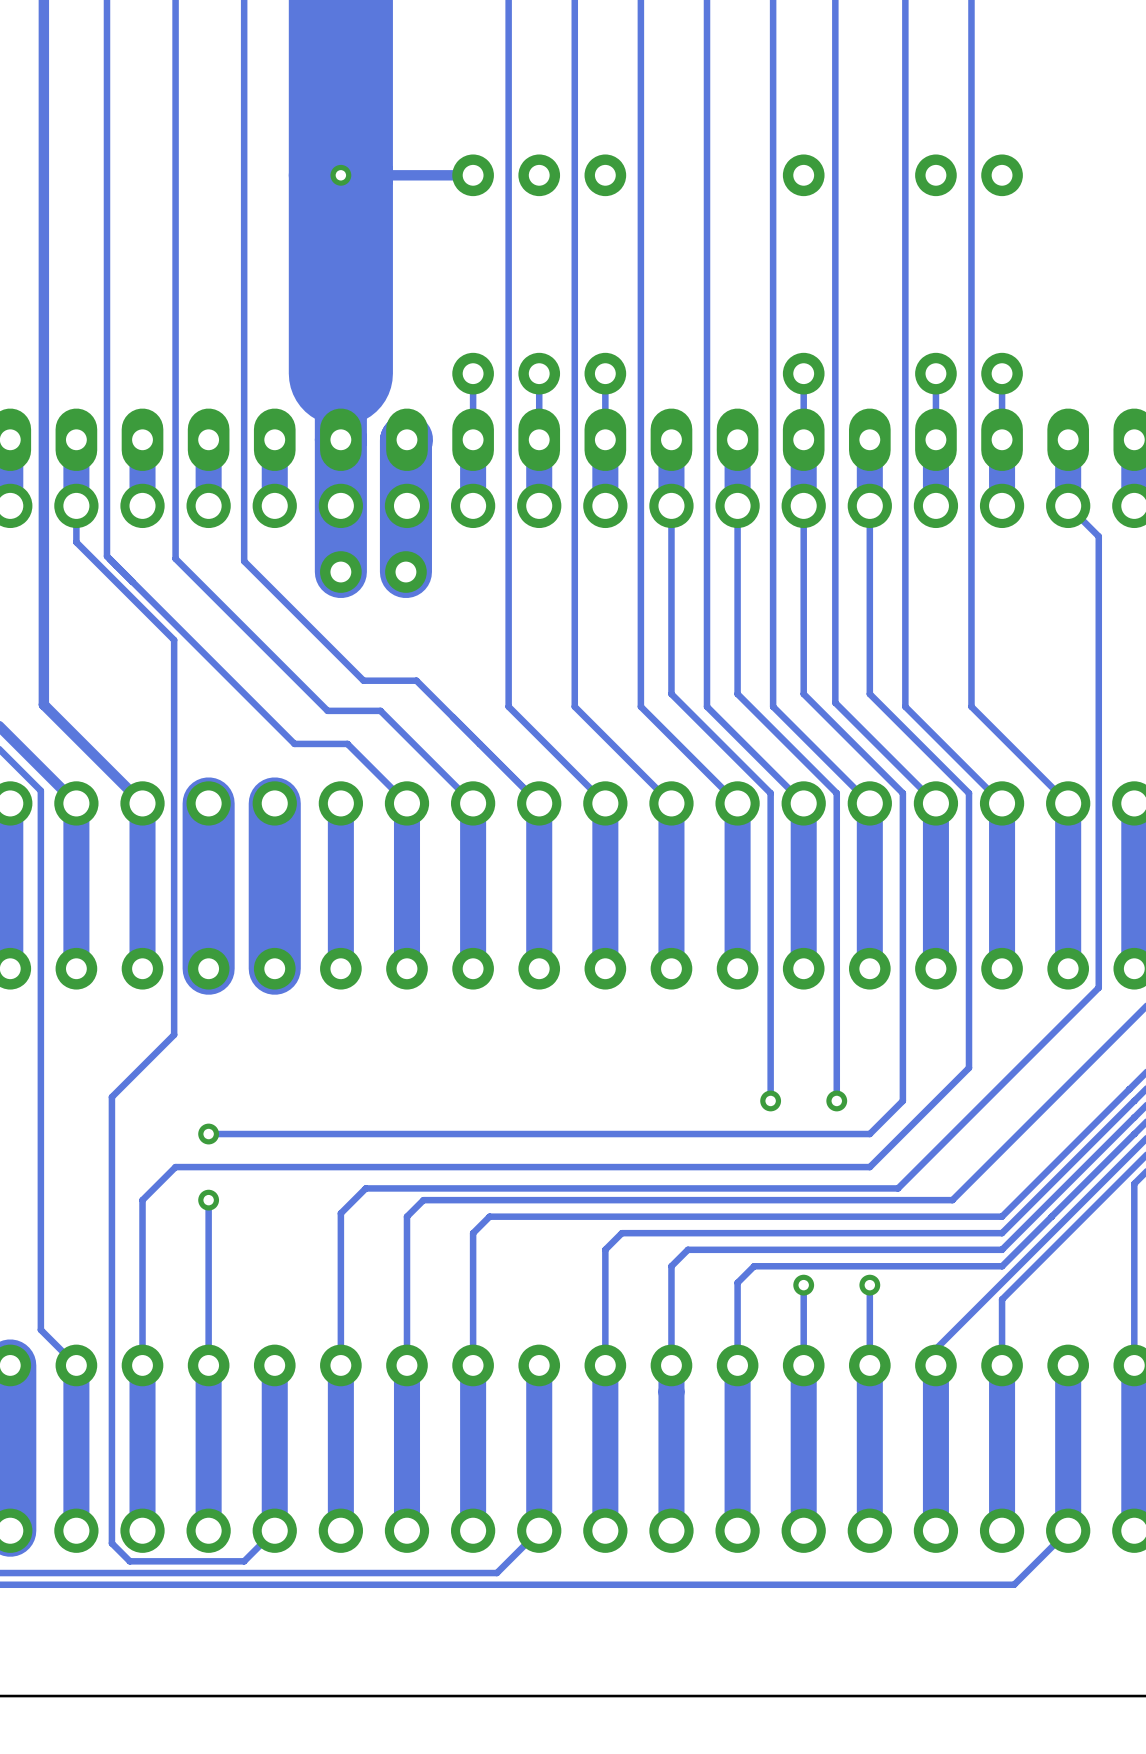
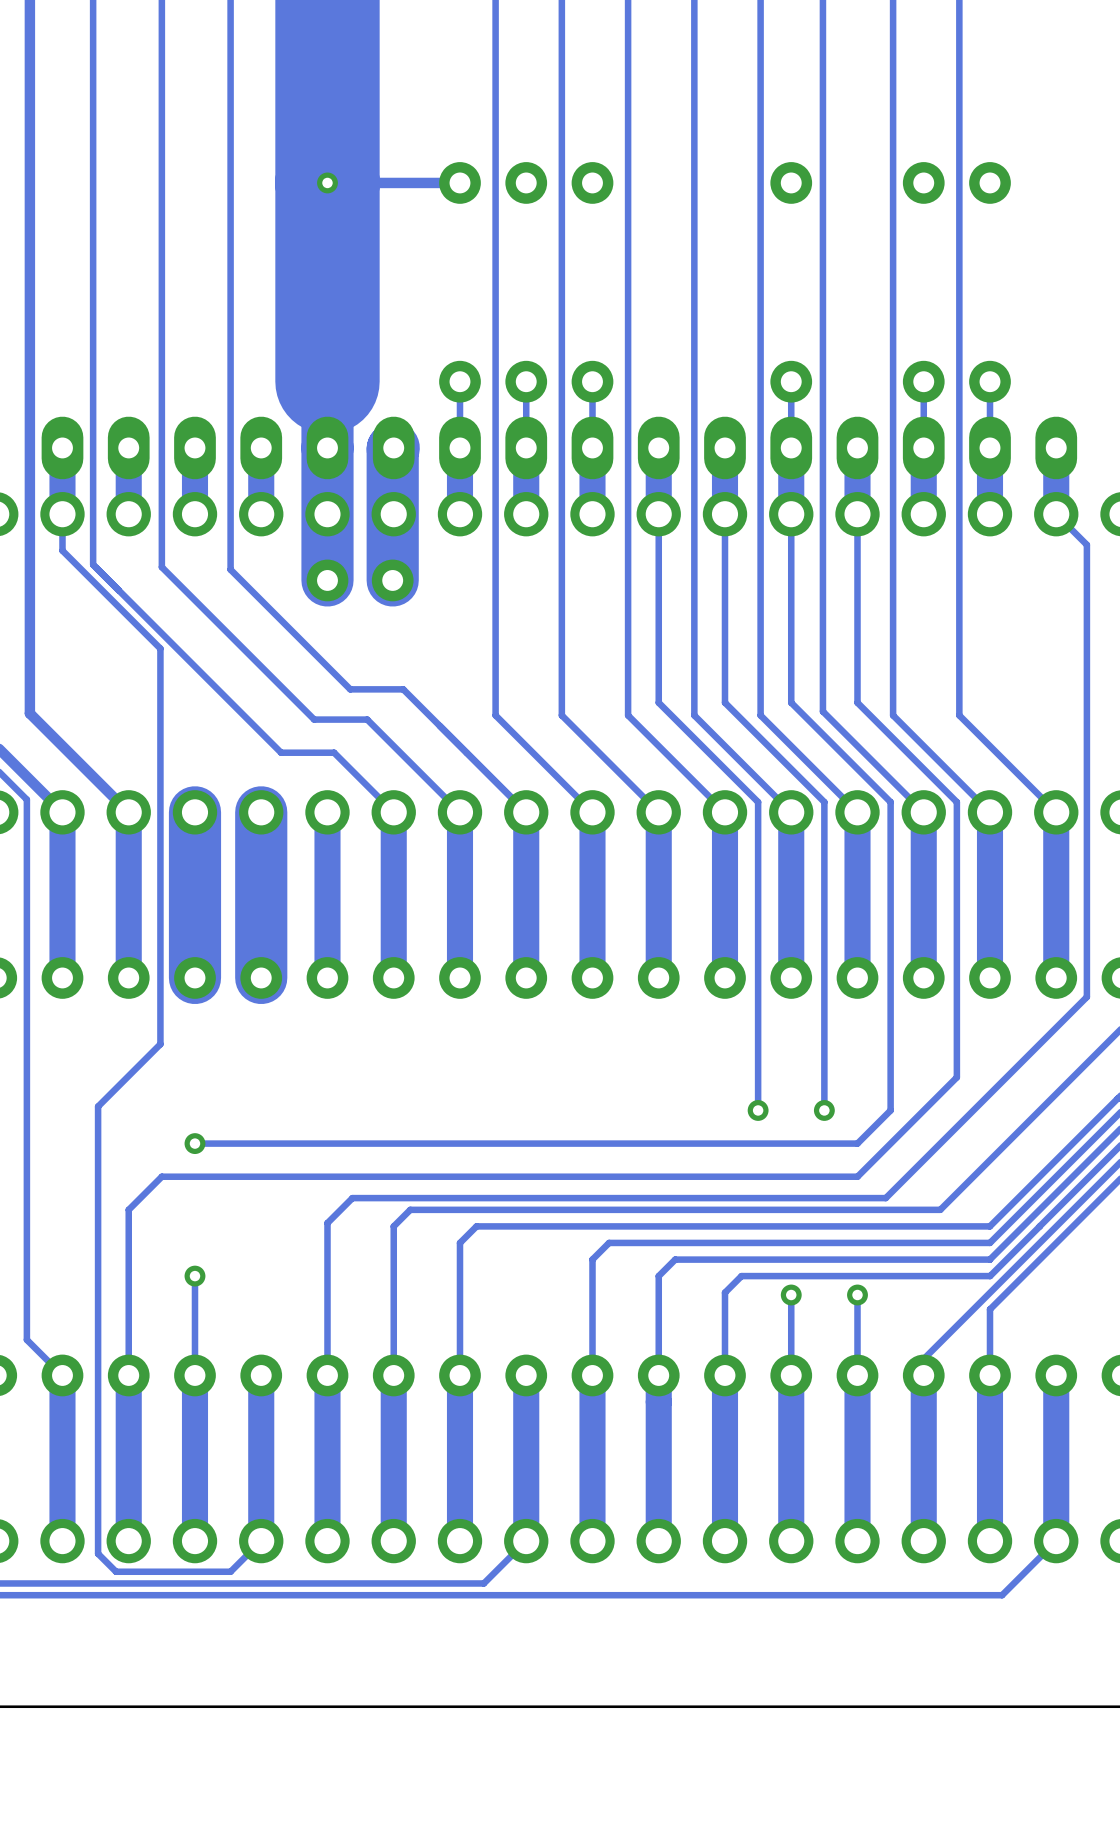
track: (208, 1200) (208, 1266) -> none
via position: (208, 1200) -> (194, 1276)

